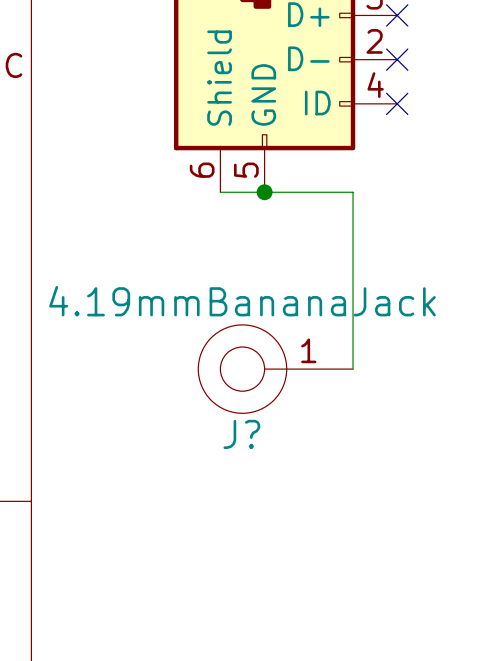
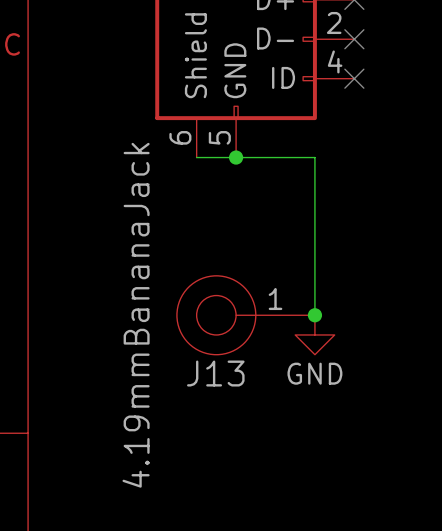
J? value rotation: 0° (242, 301) -> 90° counterclockwise (136, 315)
junction: none -> (314, 315)
power symbol: none -> GND (314, 334)
J? name: J? (241, 434) -> J13 (215, 373)

